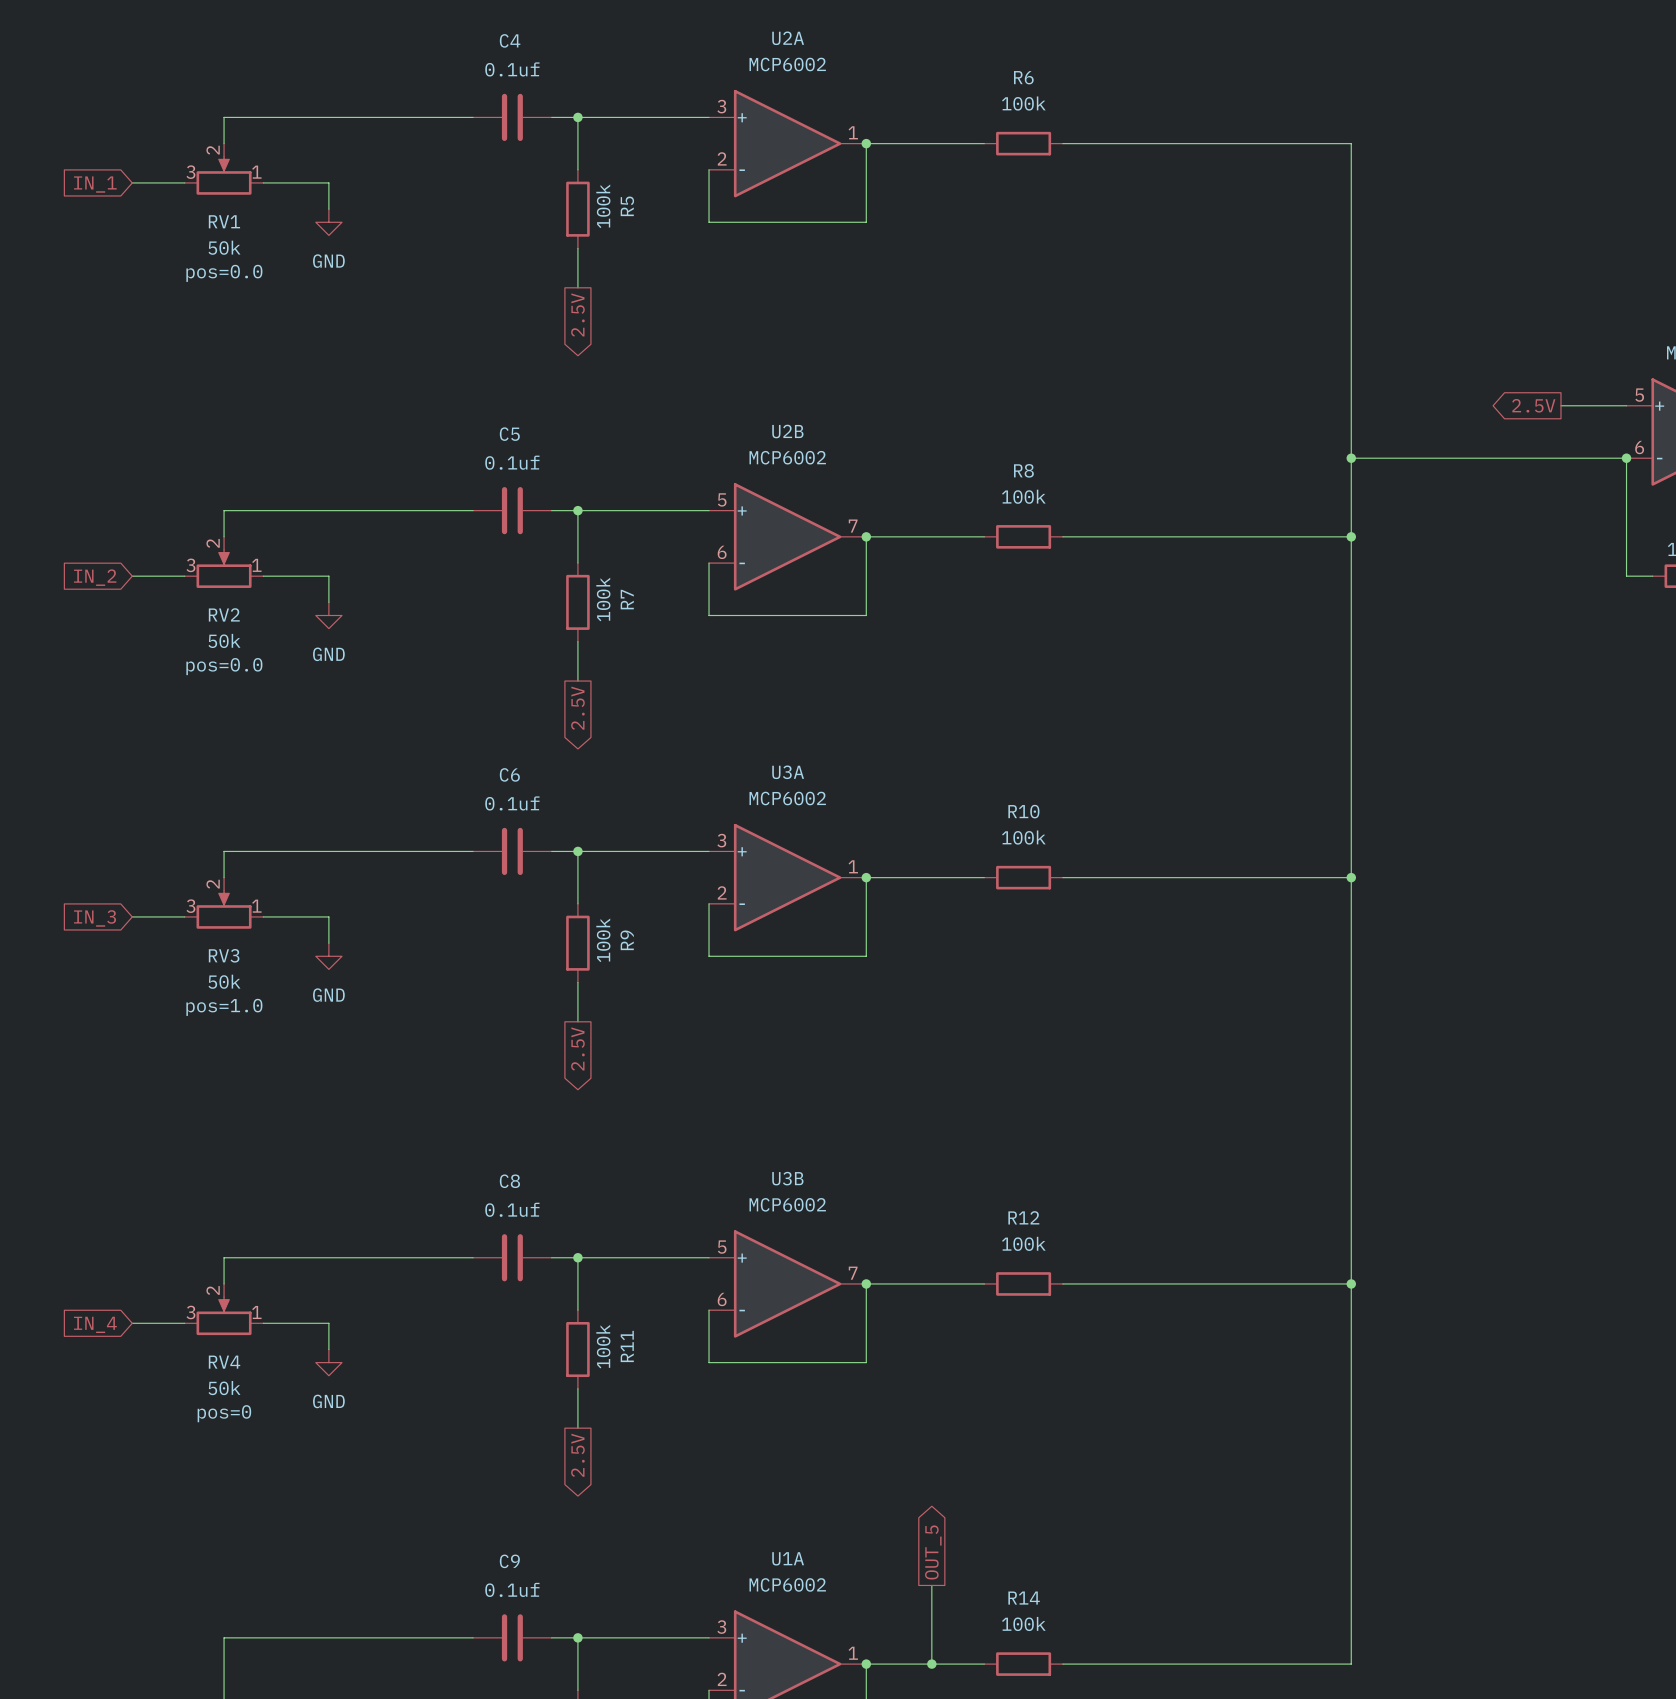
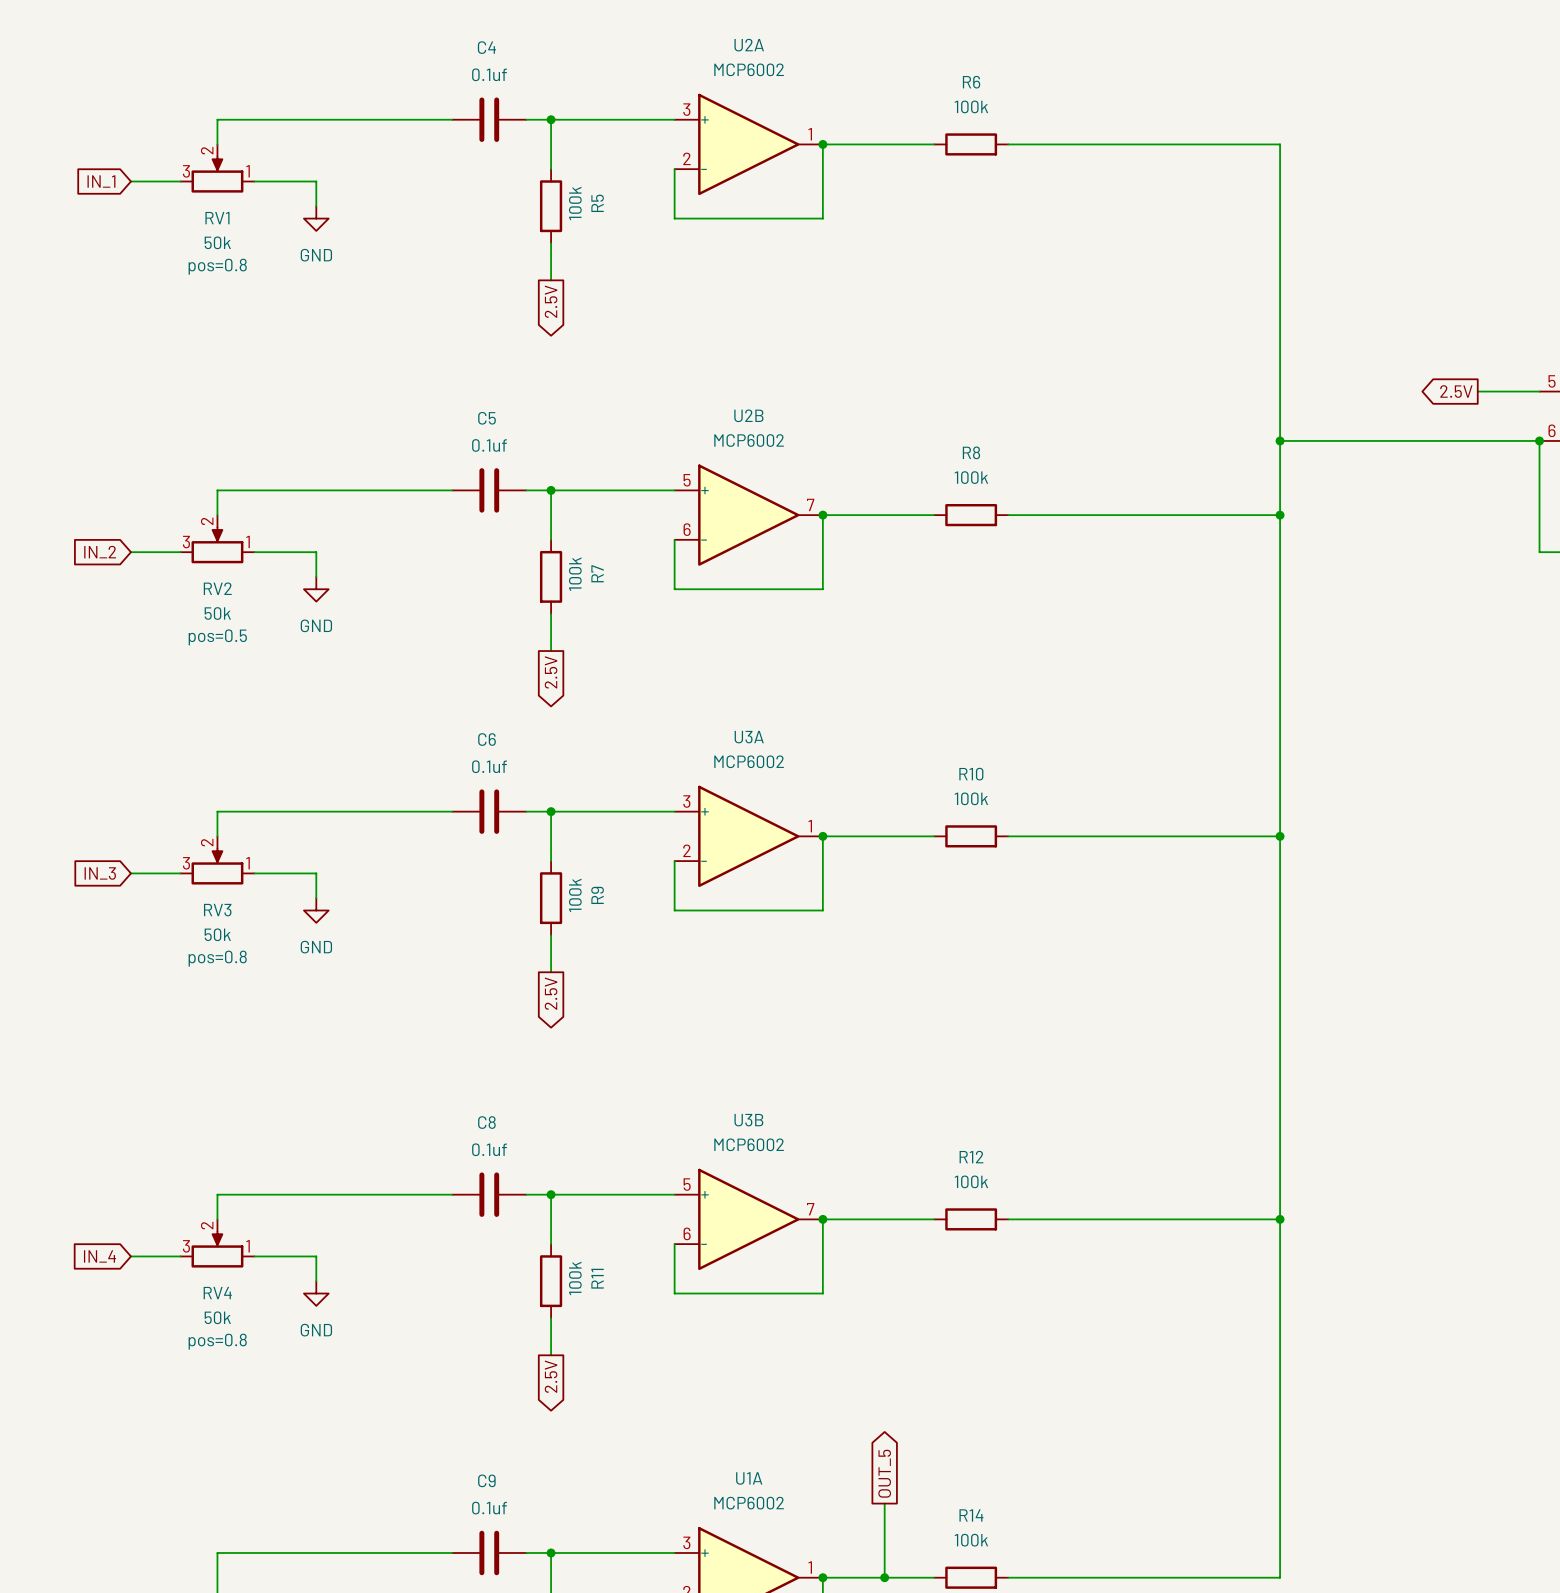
RV1 text: pos=0.0 (224, 273) -> pos=0.8 (217, 266)
RV2 text: pos=0.0 (224, 666) -> pos=0.5 (217, 637)
RV3 text: pos=1.0 (224, 1007) -> pos=0.8 (217, 958)
RV4 text: pos=0 (224, 1413) -> pos=0.8 (217, 1341)

